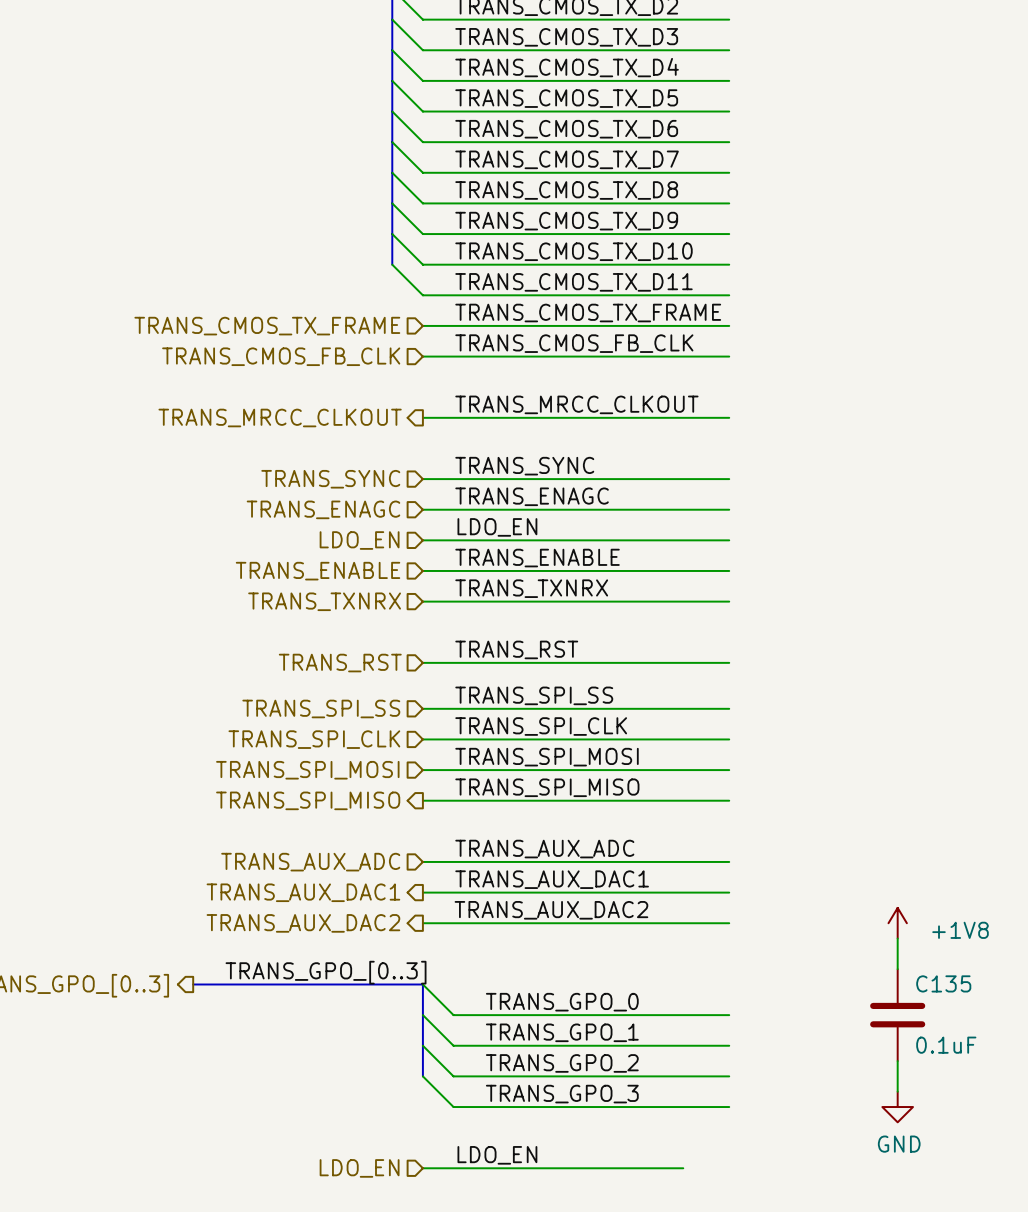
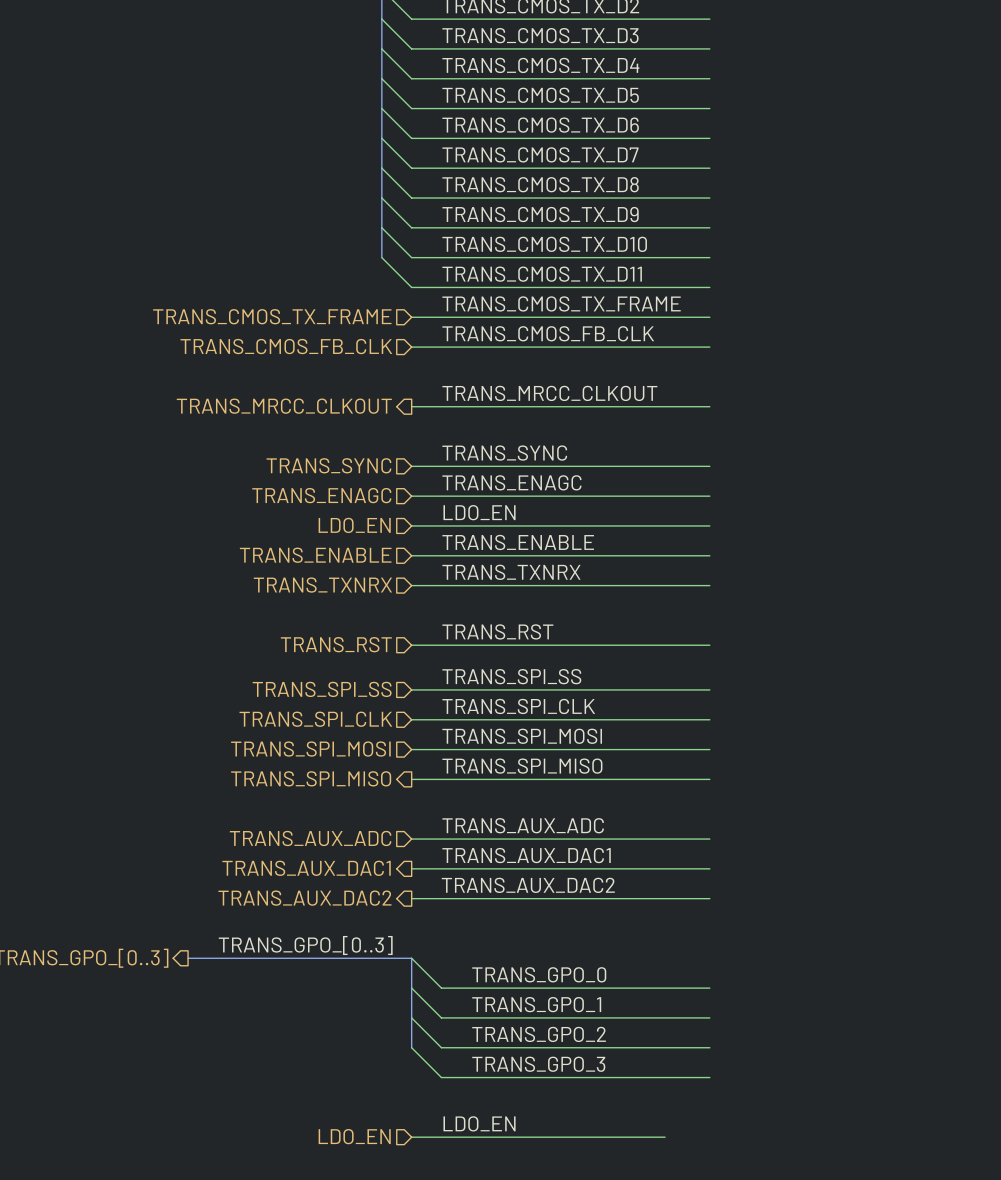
power symbol: +1V8 (897, 923) -> none
wire: (897, 938) (897, 969) -> none
C135: 0.1uF (897, 1015) -> none
wire: (897, 1061) (897, 1091) -> none
power symbol: GND (897, 1107) -> none

